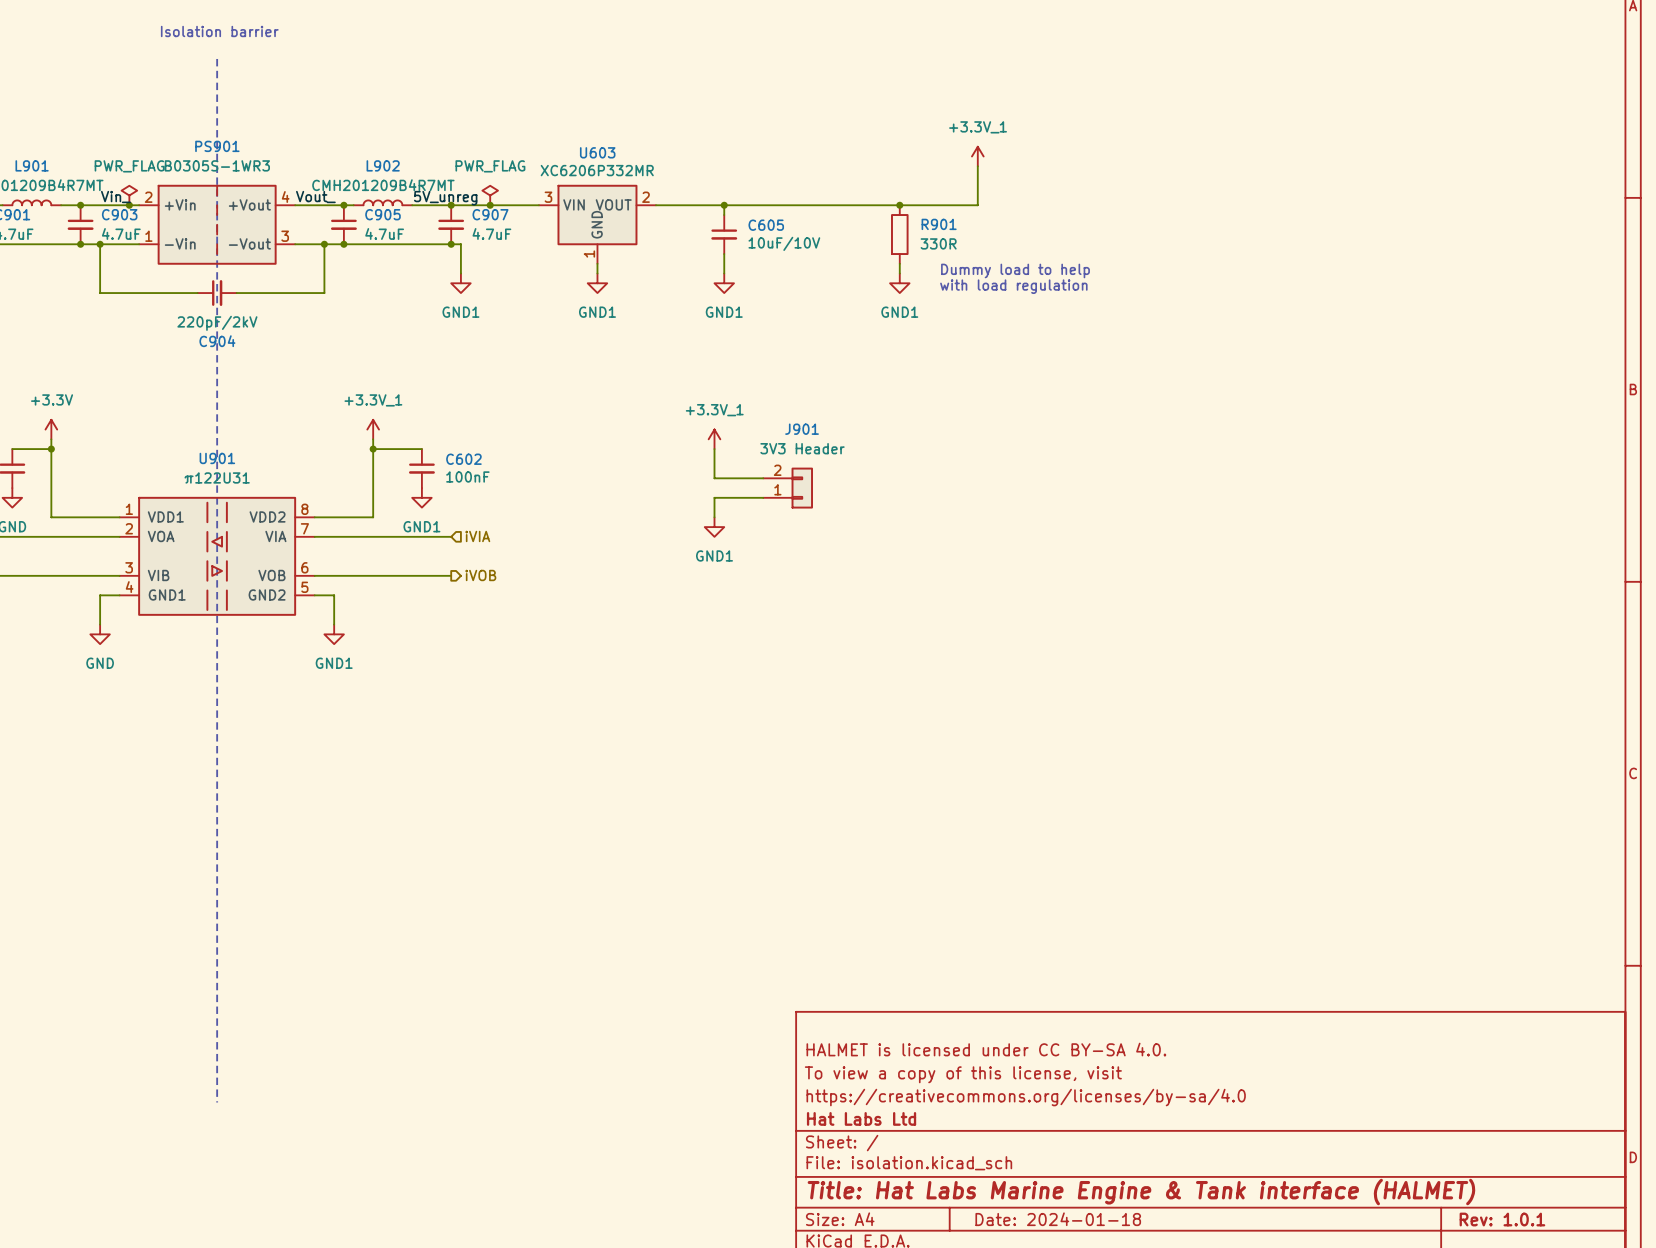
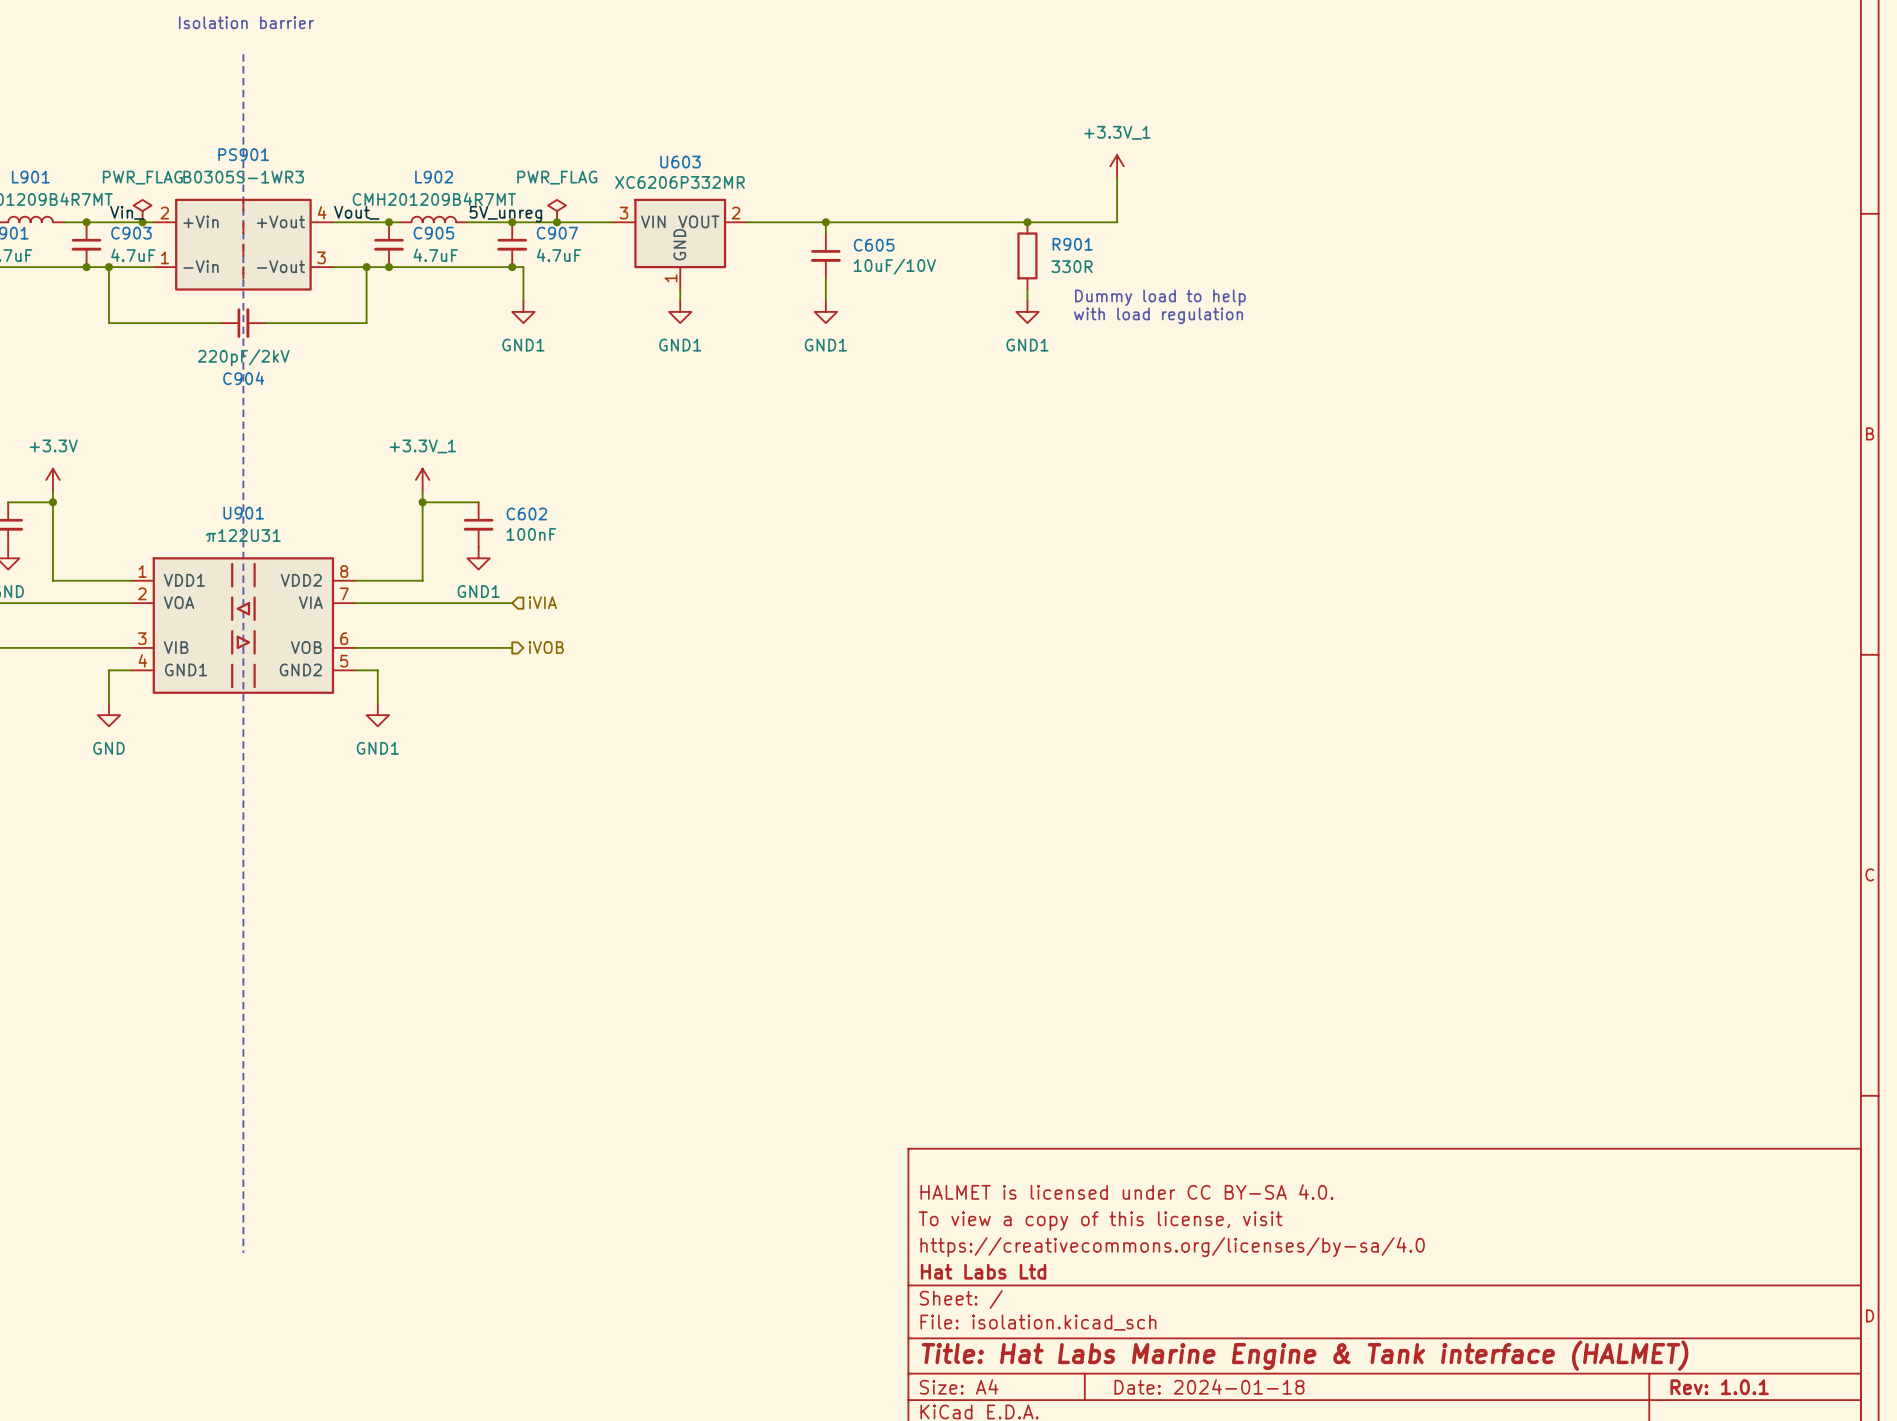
power symbol: +3.3V_1 (714, 439) -> none
wire: (714, 449) (714, 478) (763, 478) -> none
J901: 3V3 Header (788, 488) -> none
wire: (763, 497) (714, 497) (714, 517) -> none
power symbol: GND1 (714, 527) -> none

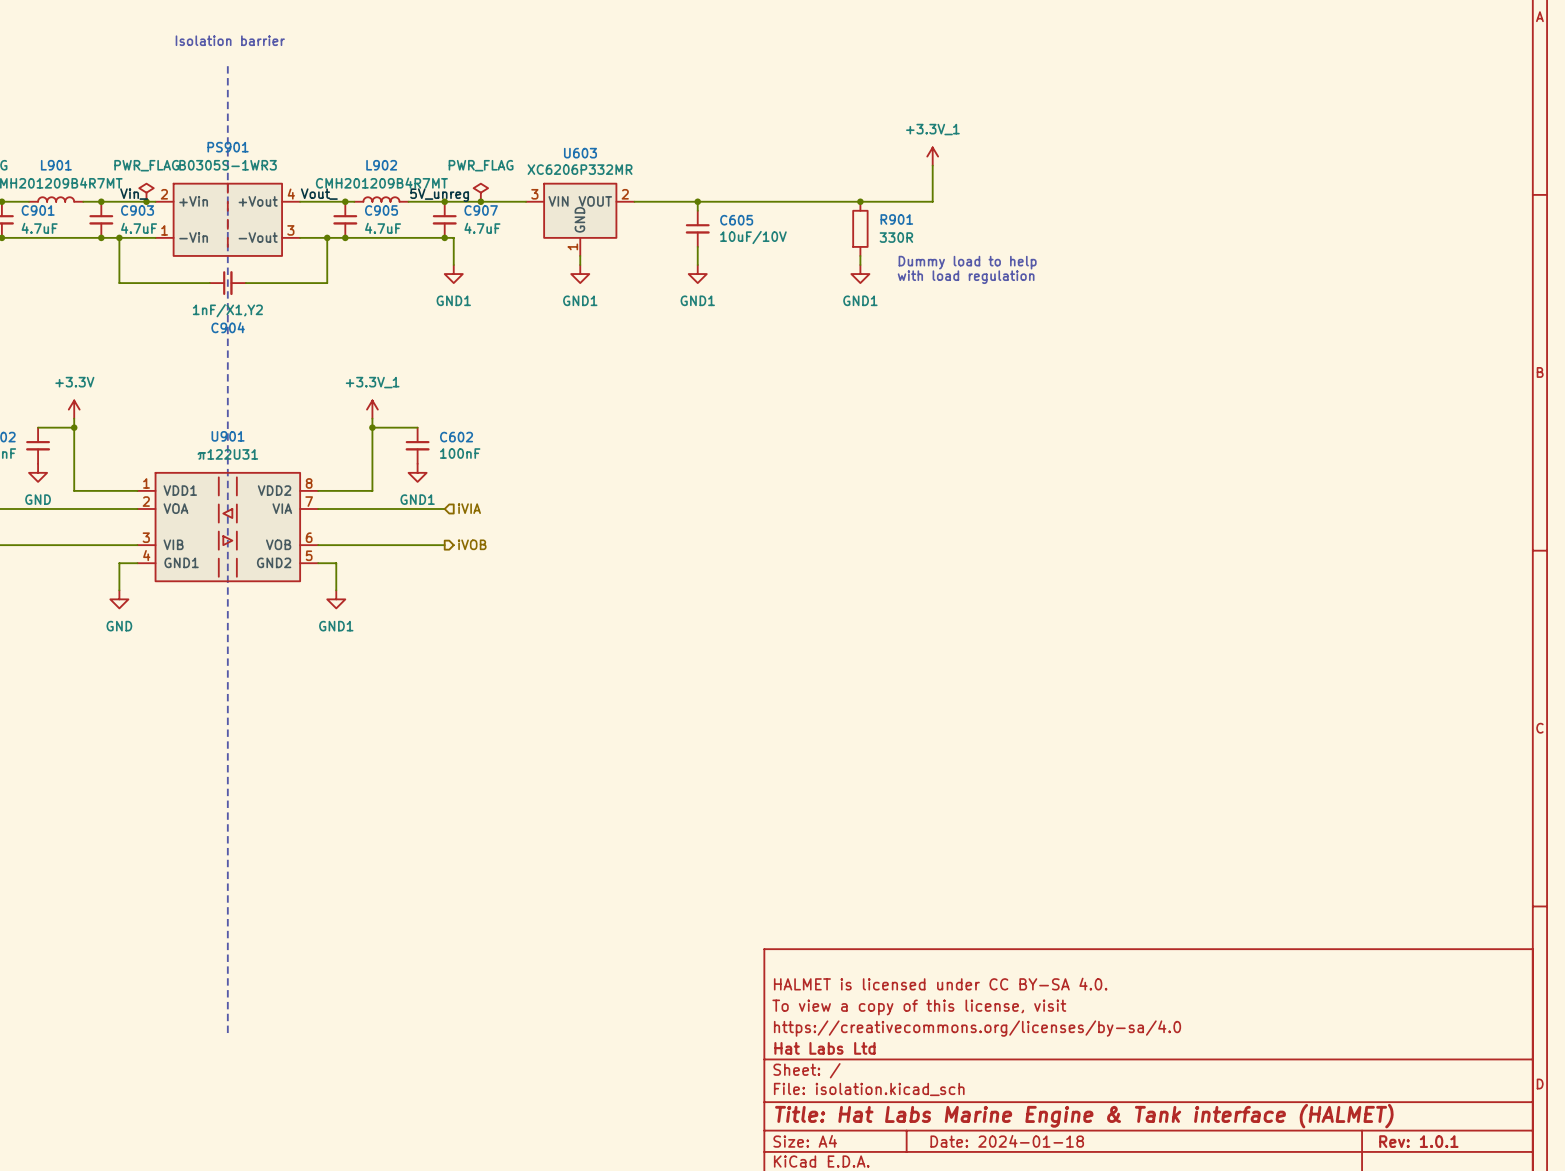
C904 value: 220pF/2kV (243, 357) -> 1nF/X1,Y2 (227, 310)

